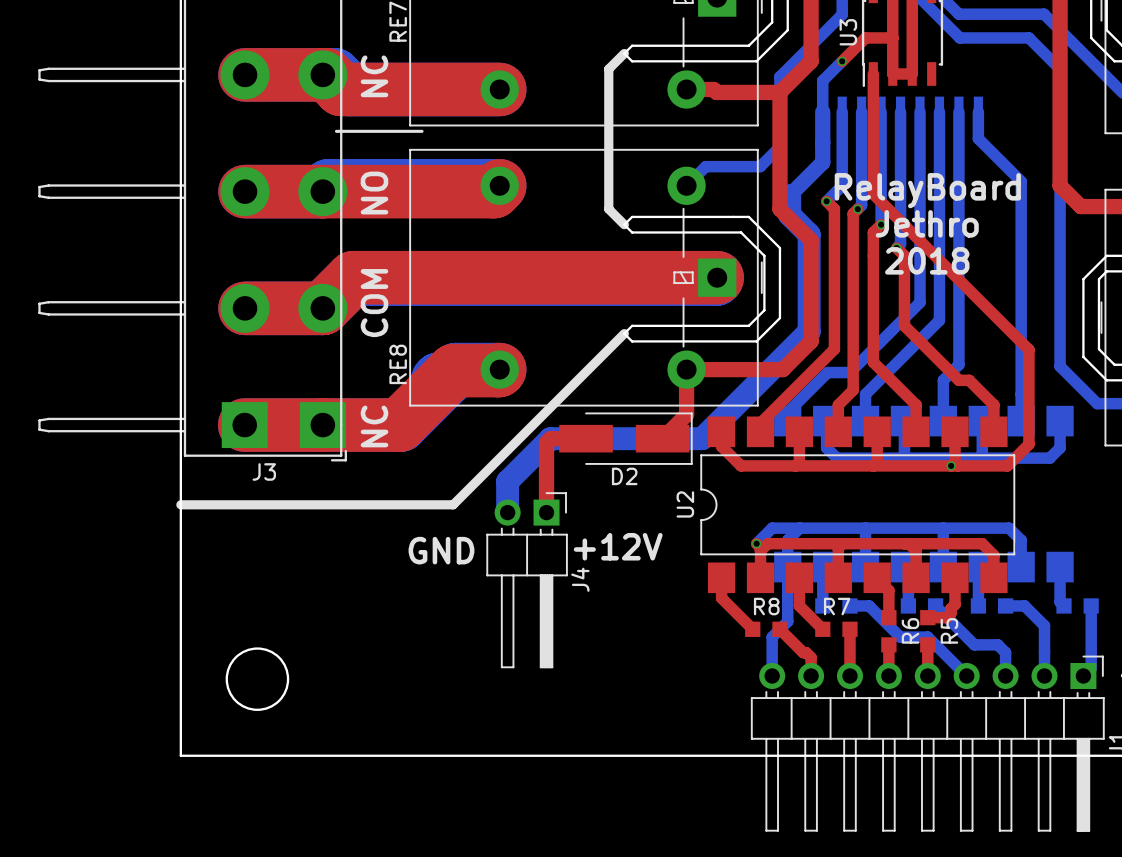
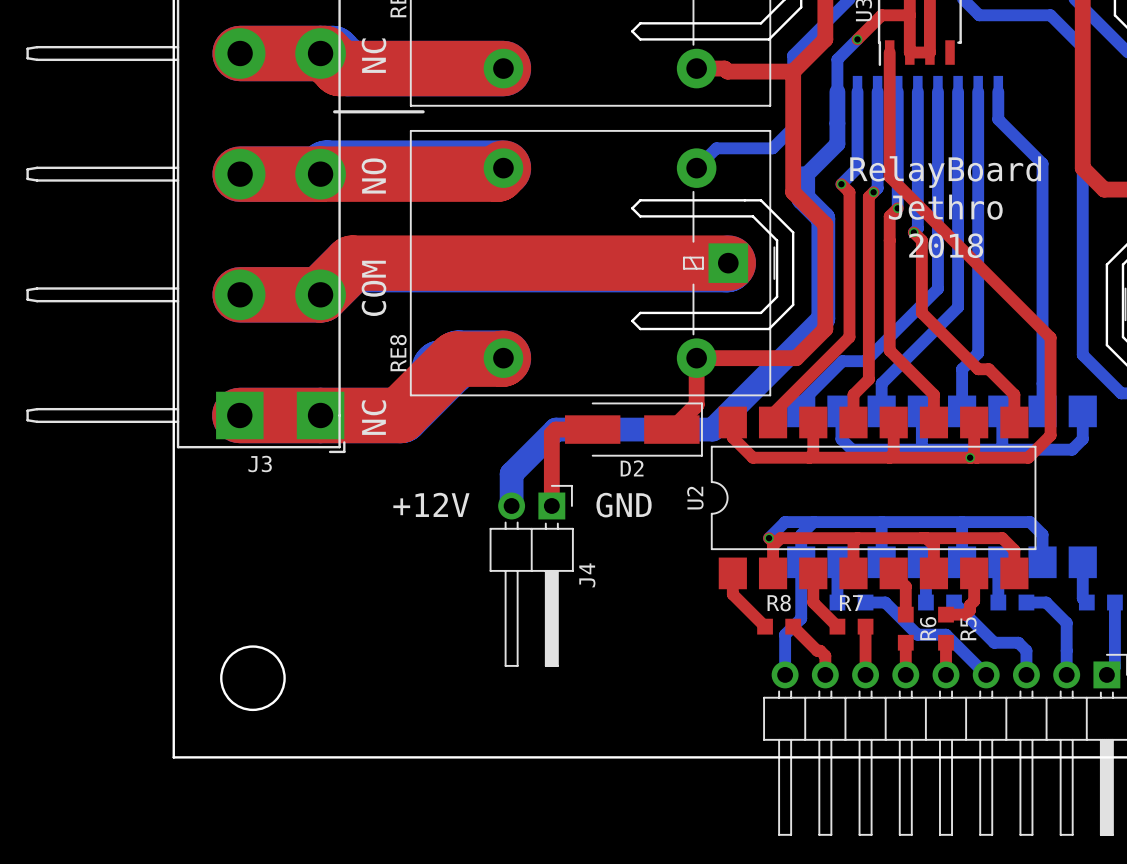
line: (624, 53) (608, 69) (608, 209) (624, 224) -> none
line: (624, 333) (453, 504) (180, 504) -> none
text position: +12V (618, 546) -> +12V (431, 504)
text position: GND (441, 550) -> GND (624, 505)

